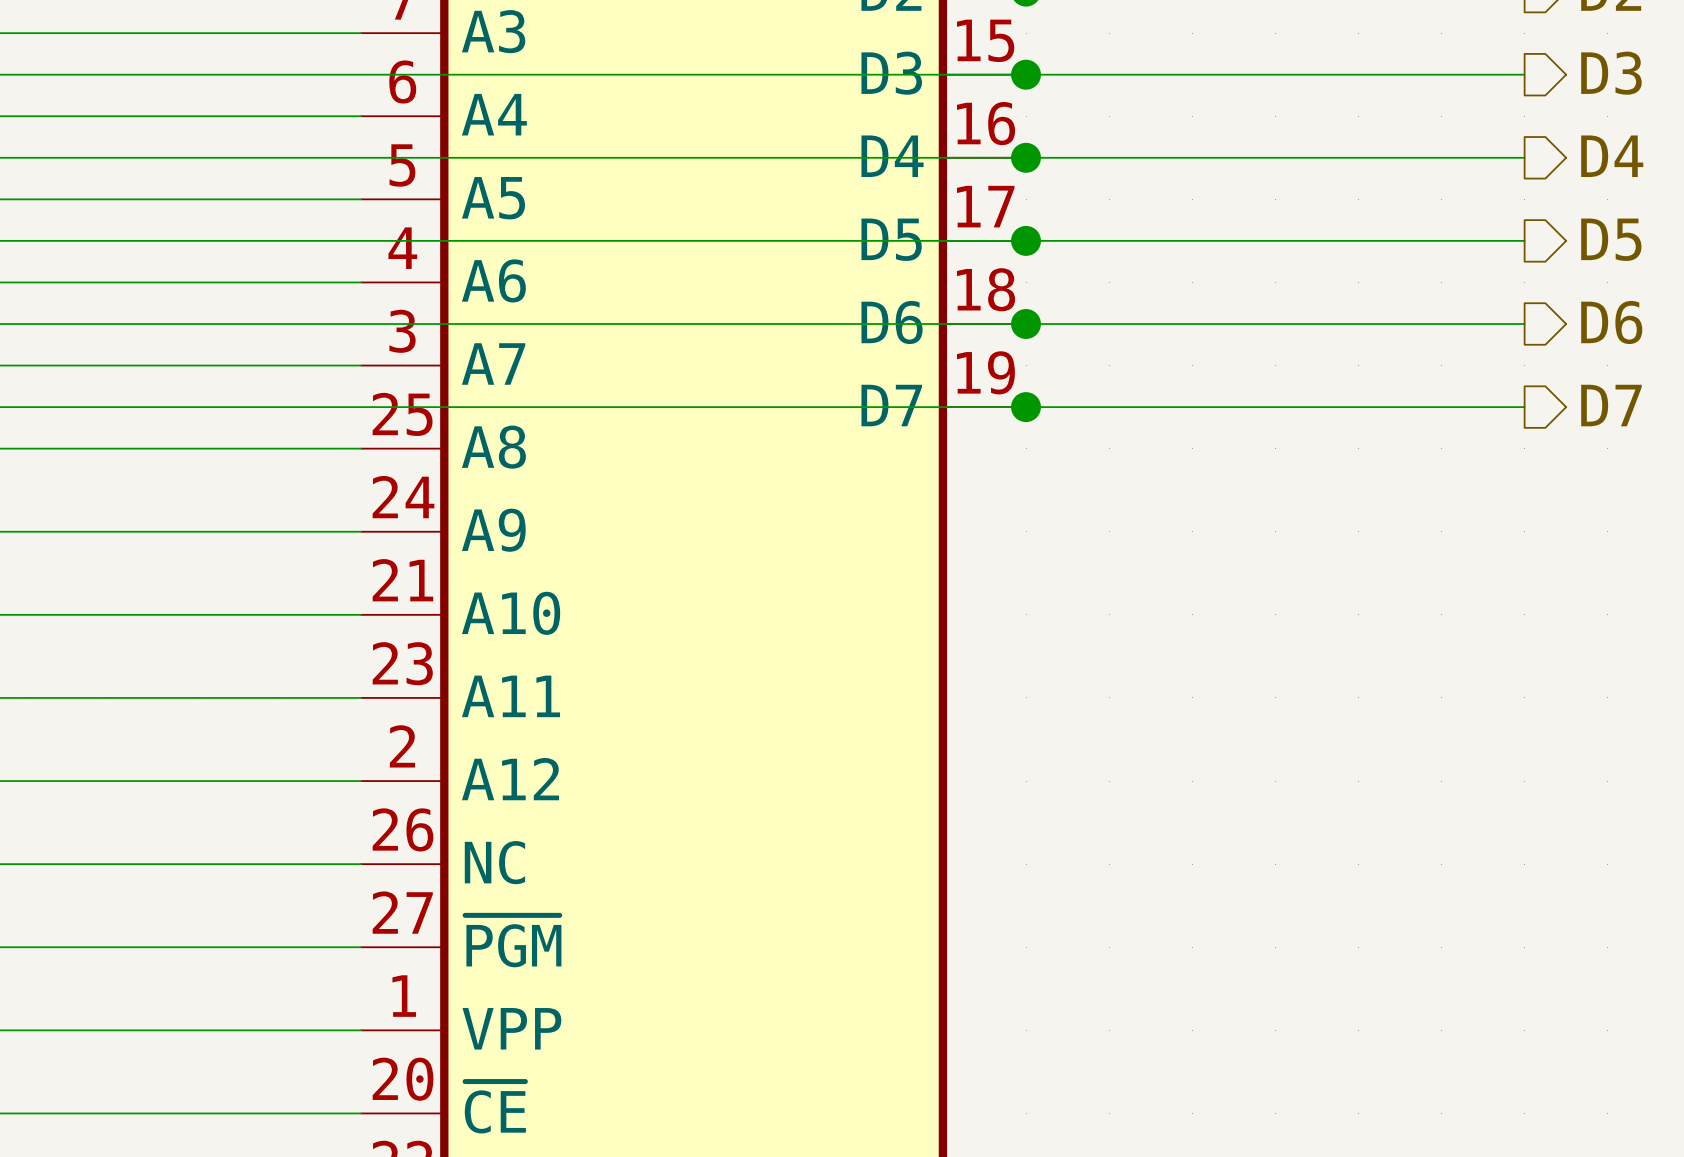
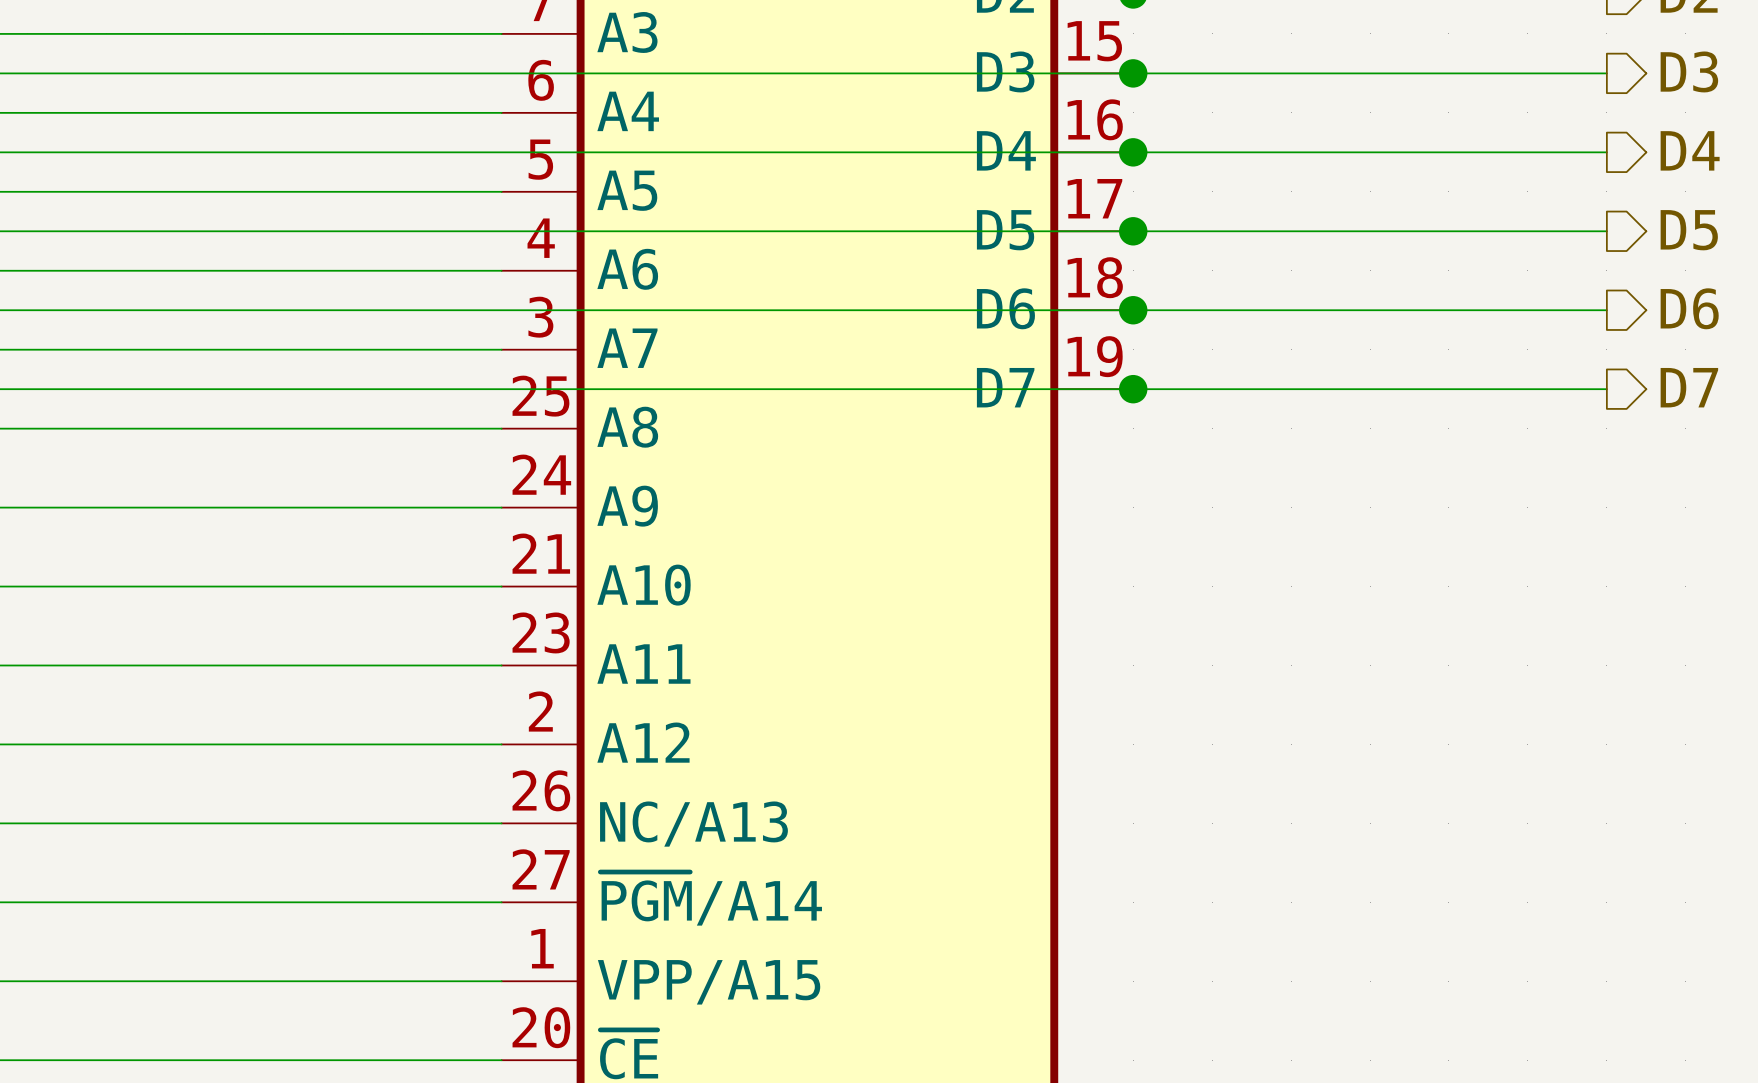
part pin name: NC (494, 862) -> NC/A13 (693, 824)
part pin name: ~{PGM} (513, 941) -> ~{PGM}/A14 (711, 898)
part pin name: VPP (511, 1028) -> VPP/A15 (709, 982)

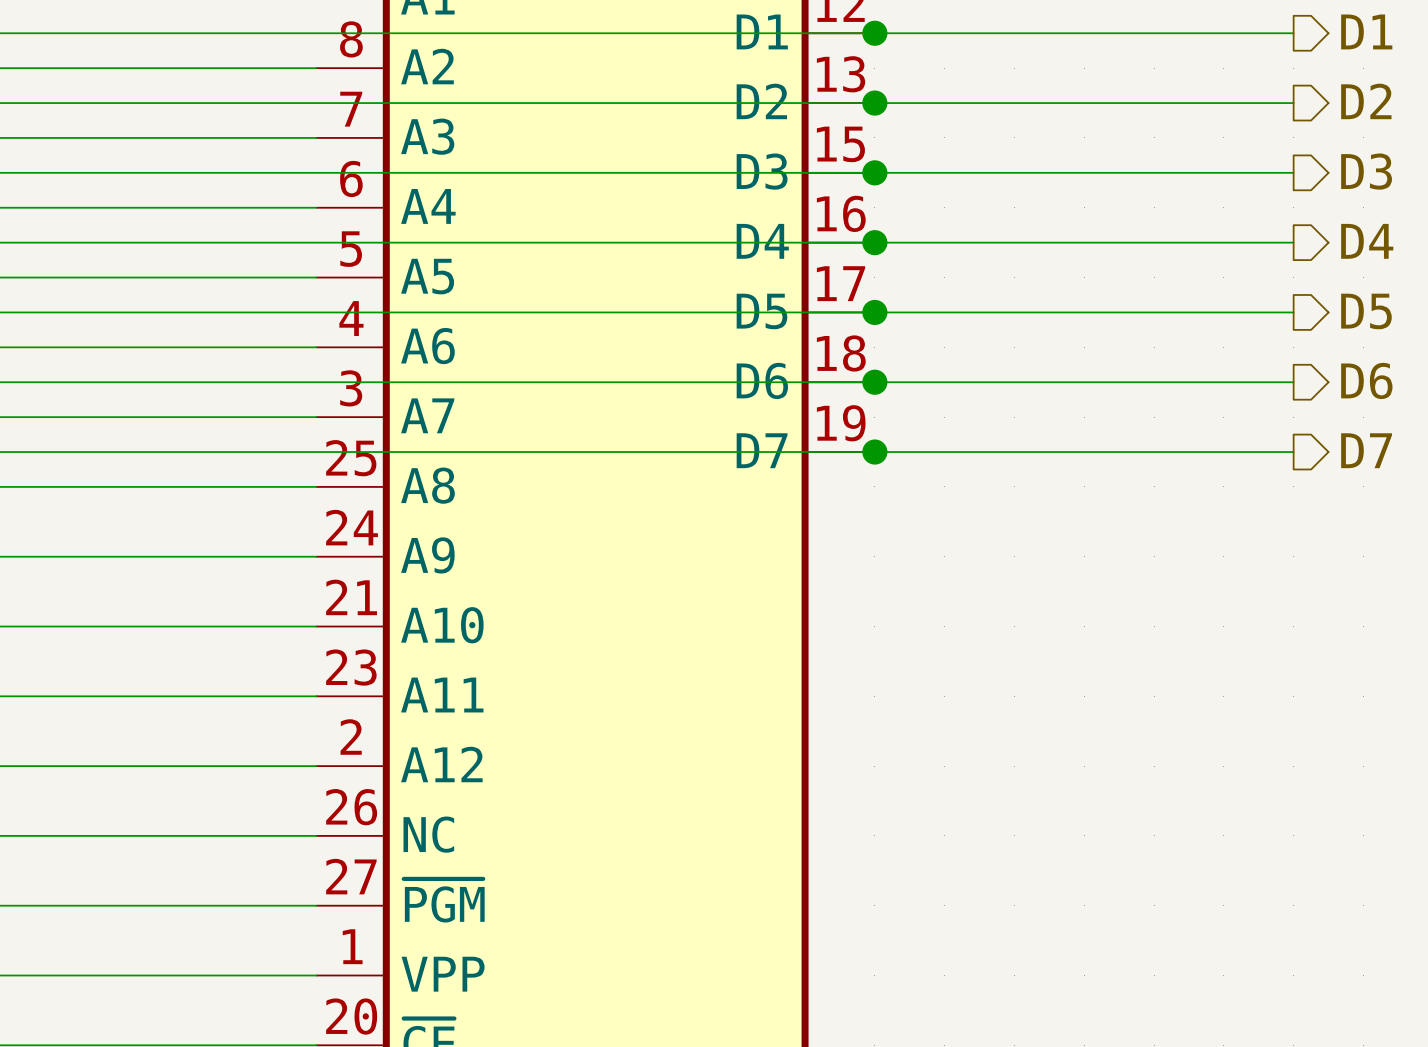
part pin name: NC/A13 (693, 824) -> NC (428, 834)
part pin name: ~{PGM}/A14 (711, 898) -> ~{PGM} (444, 900)
part pin name: VPP/A15 (709, 982) -> VPP (443, 974)

